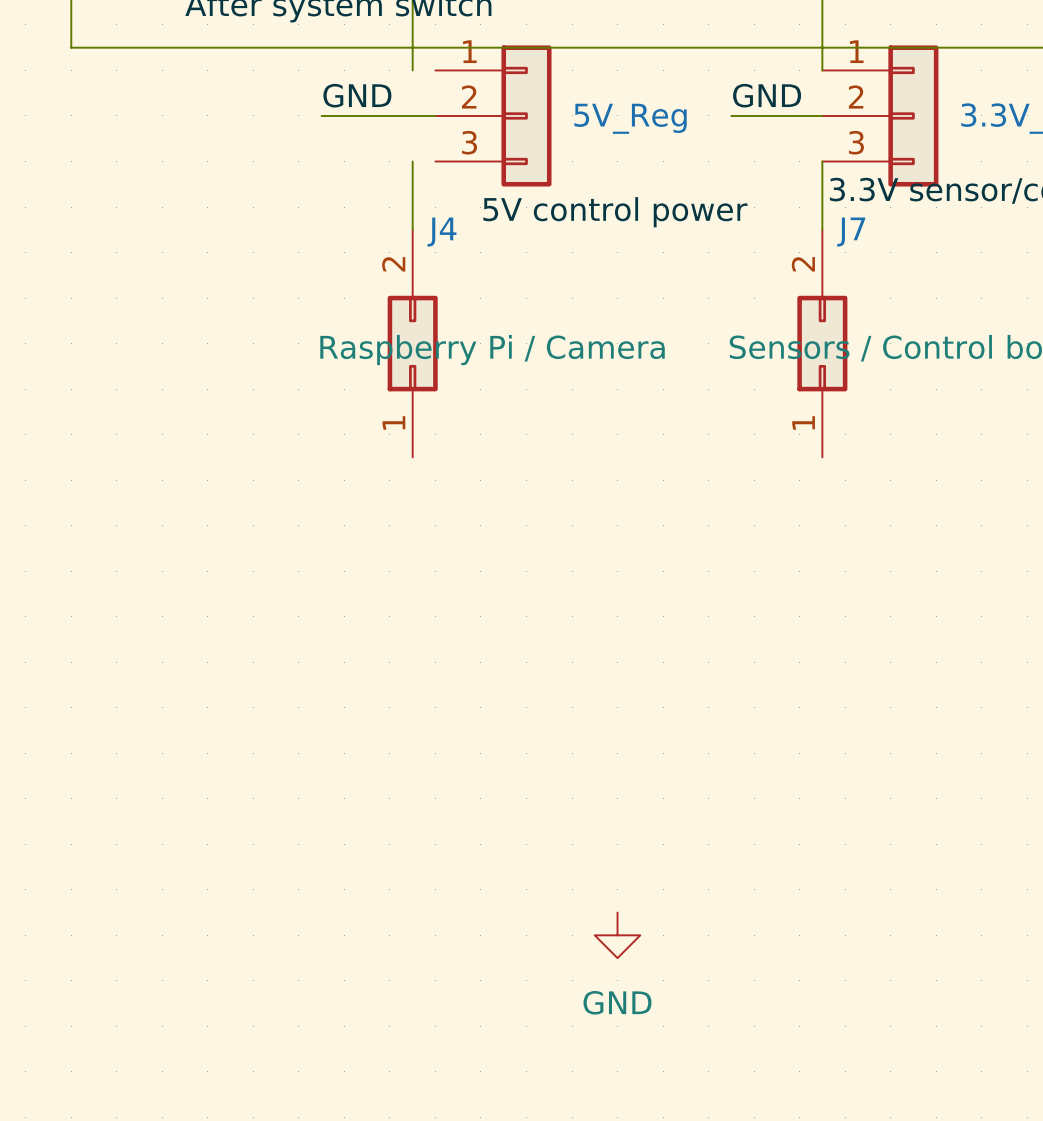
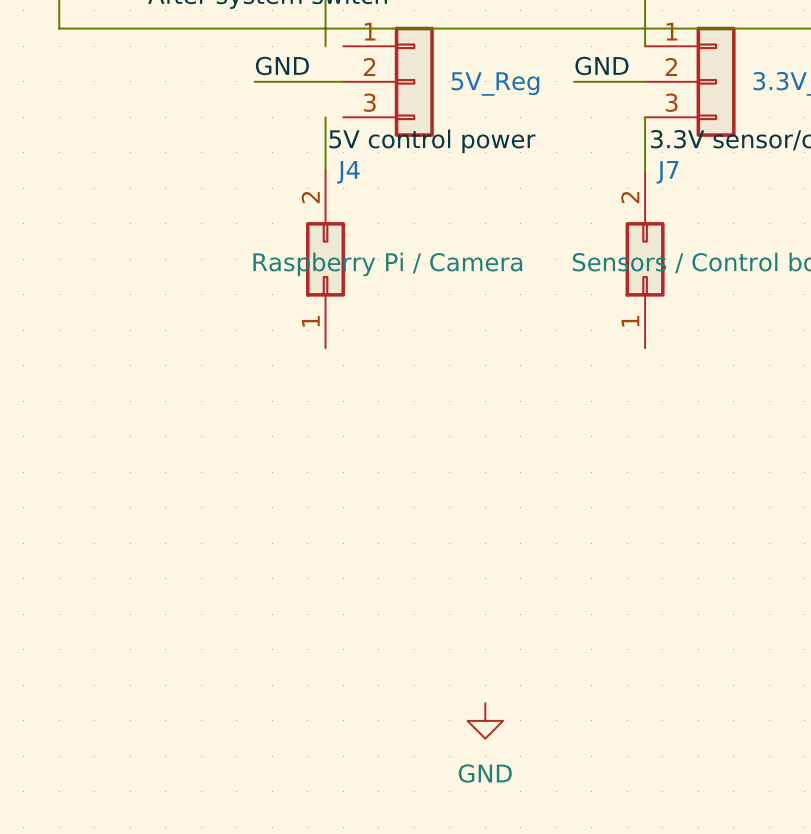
label position: 5V control power (615, 212) -> 5V control power (432, 141)

